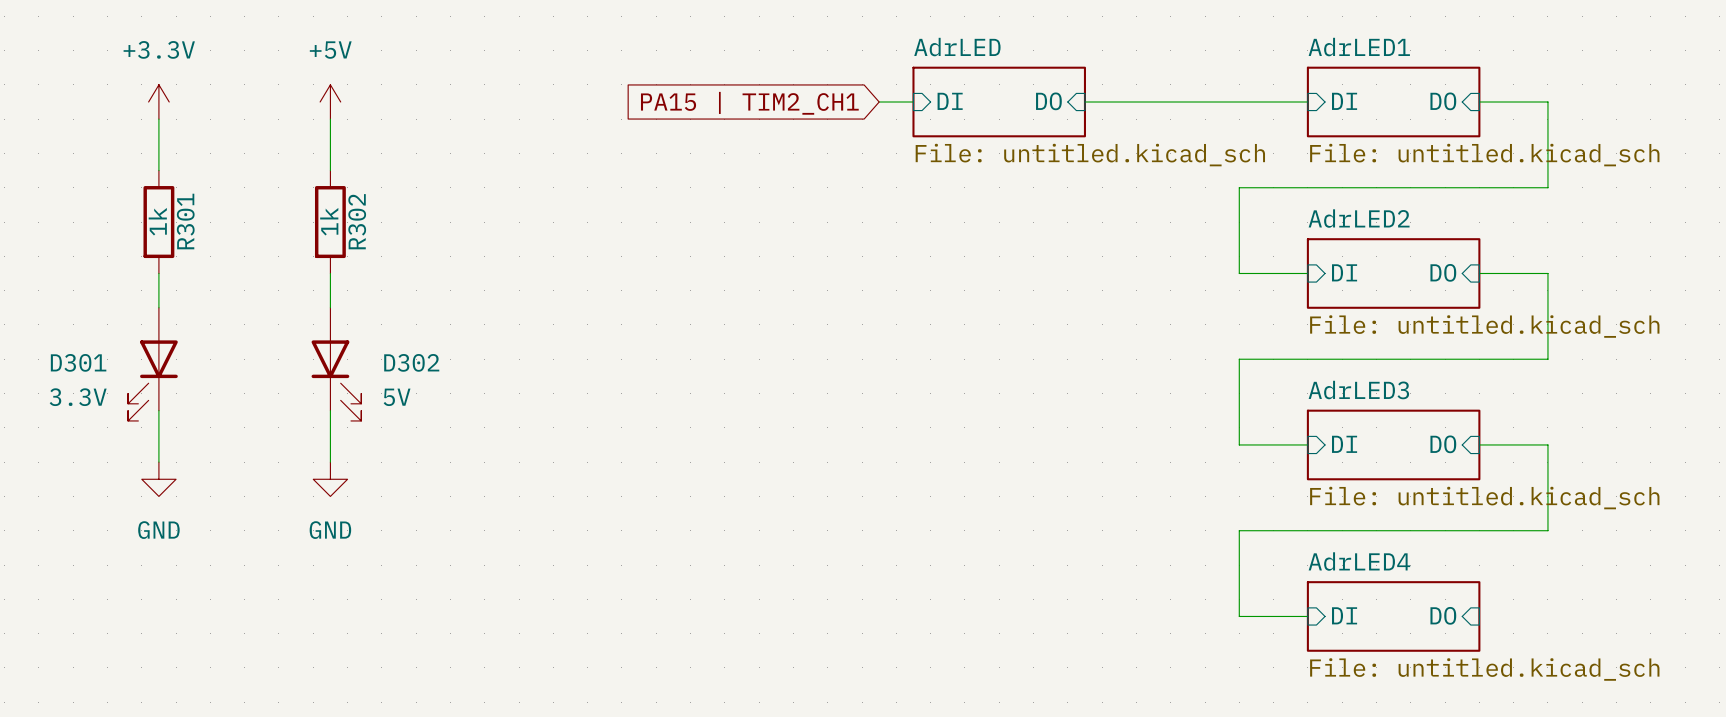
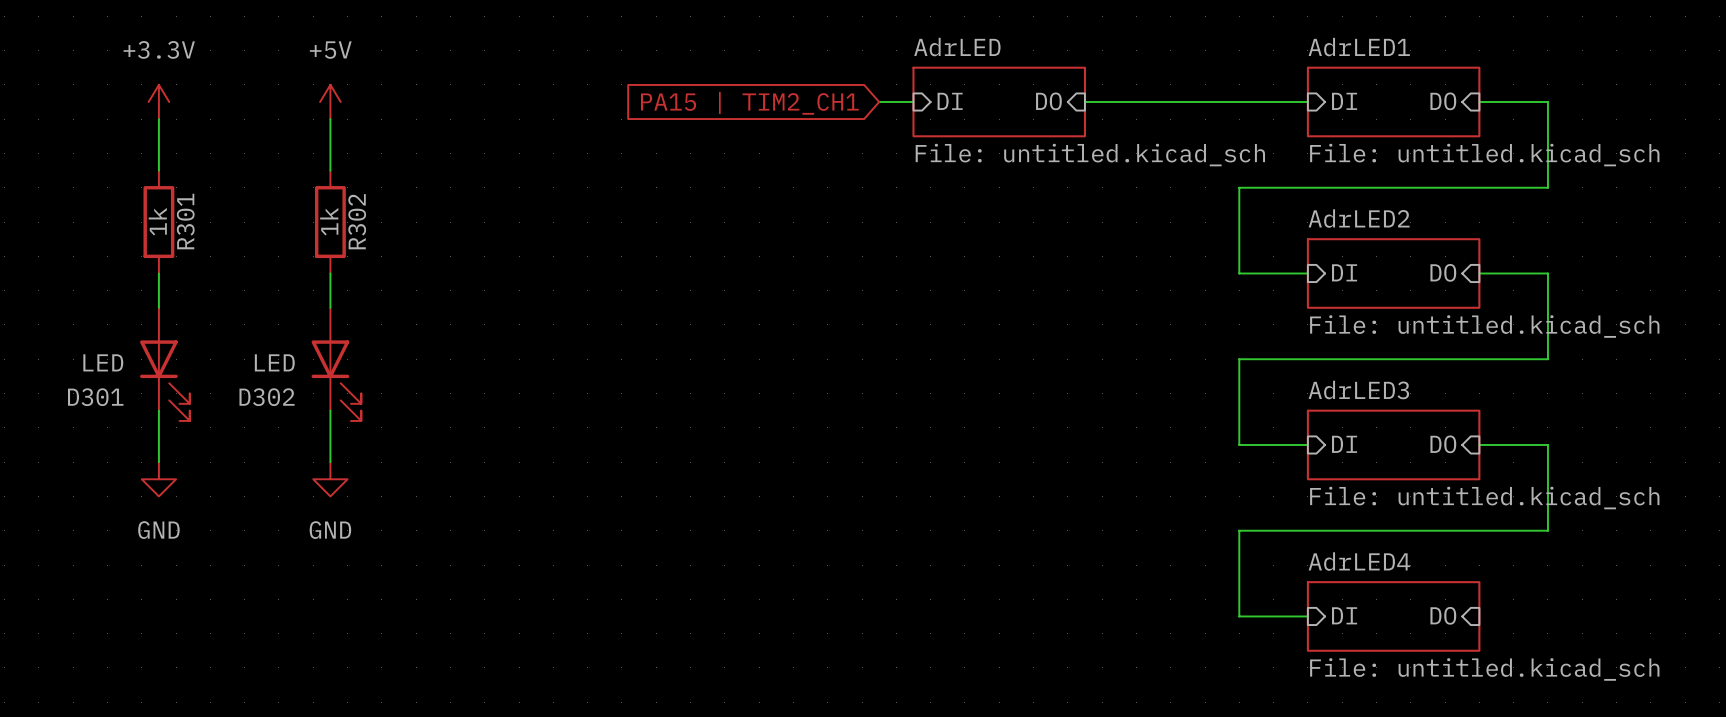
D301 name position: D301 (78, 362) -> D301 (95, 397)
D302 name position: D302 (411, 362) -> D302 (267, 397)
D301 flip: as is (152, 380) -> left-right (164, 380)
D301 value: 3.3V (78, 397) -> LED (103, 362)
D302 value: 5V (397, 397) -> LED (274, 362)

